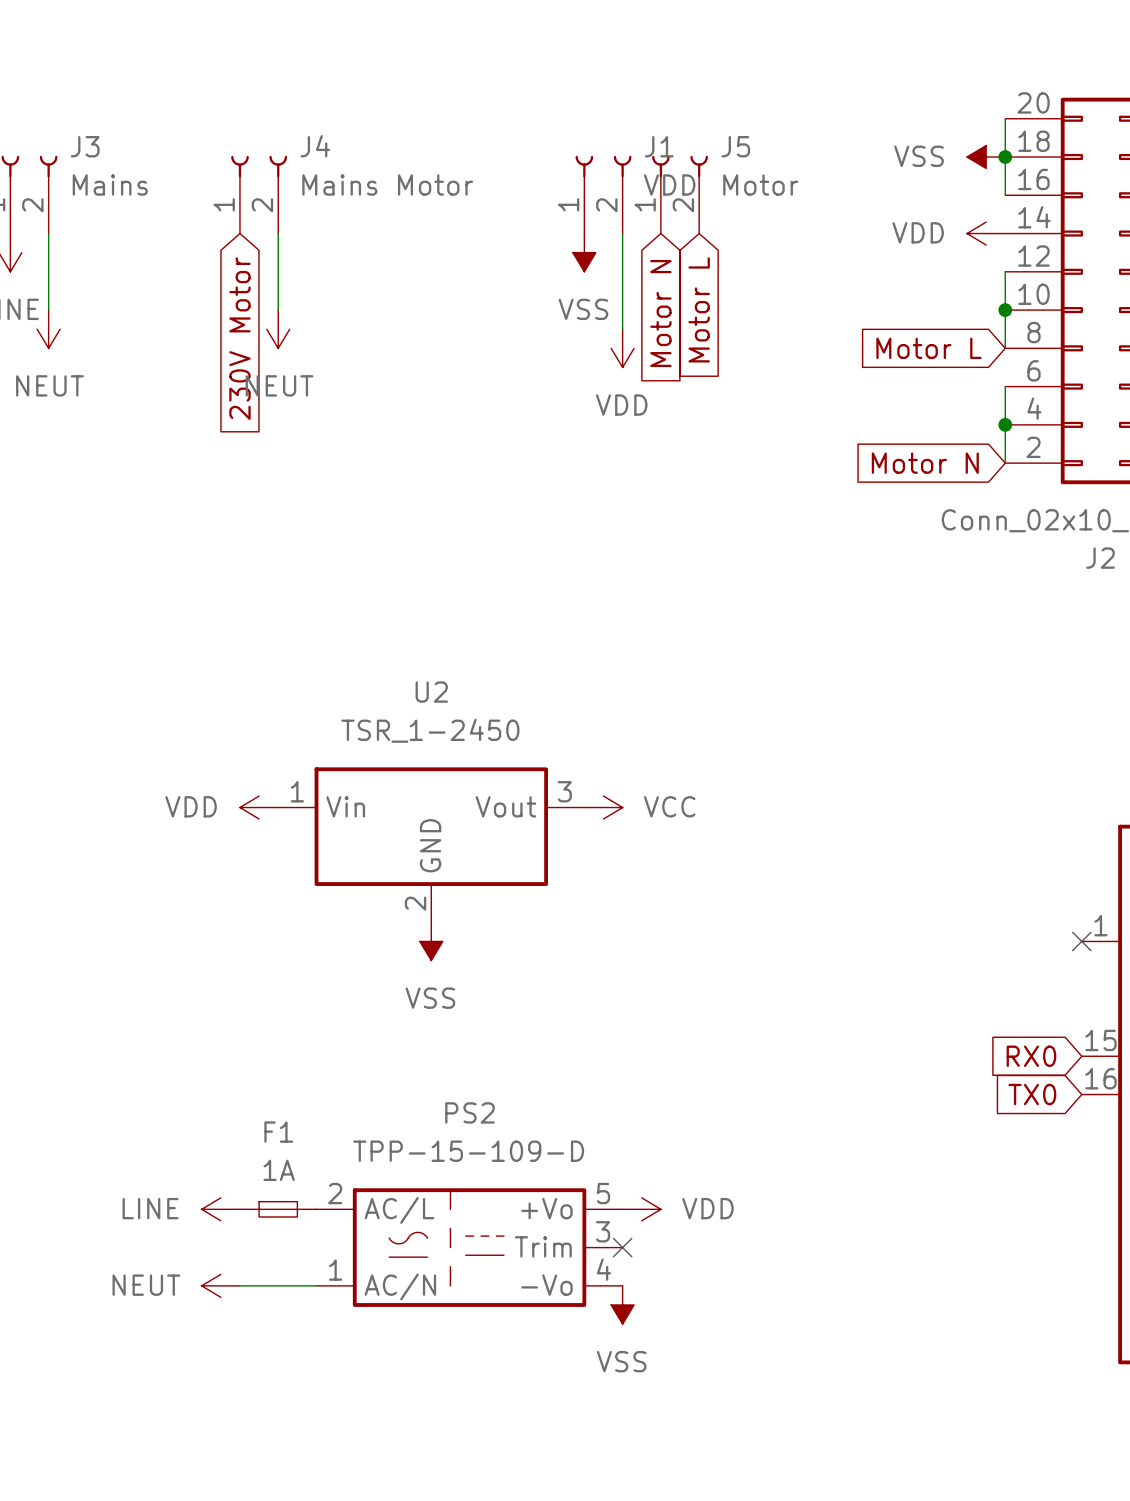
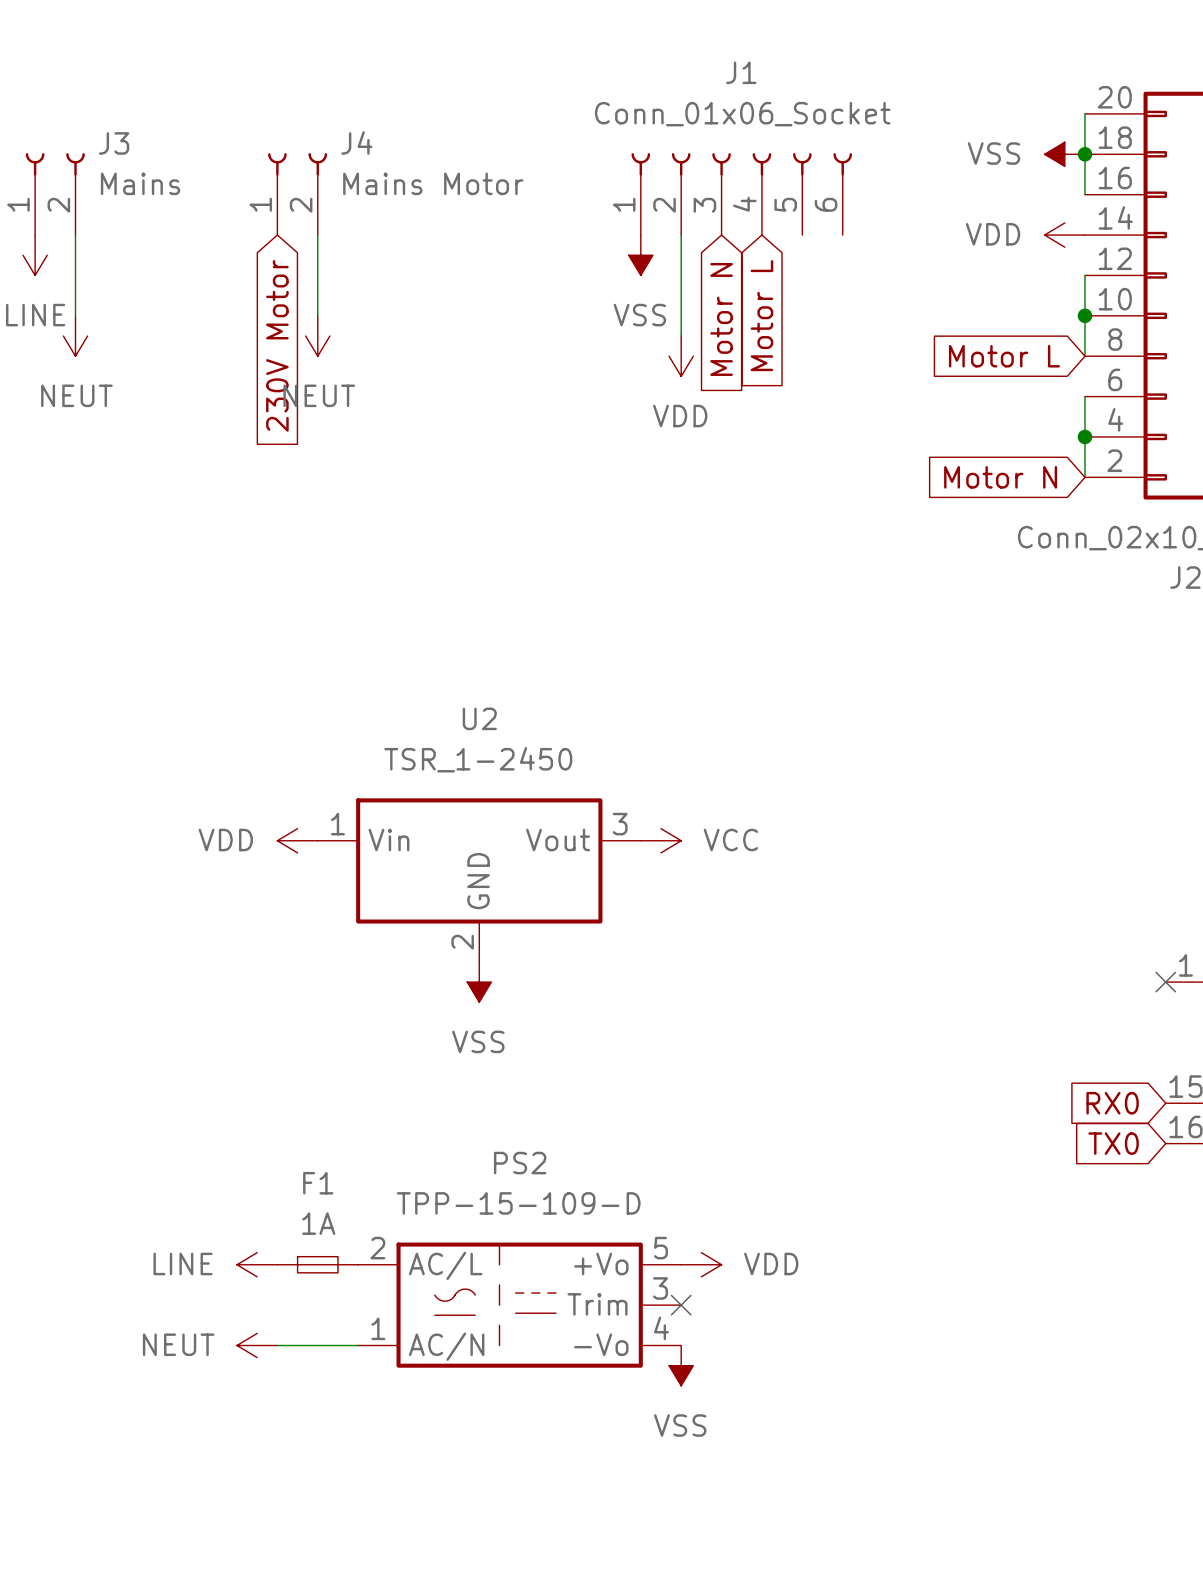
J1 name position: J1 (659, 146) -> J1 (741, 72)
J1 symbol: [575, 155, 632, 234] -> [631, 153, 853, 236]
J1 value: VDD (669, 184) -> Conn_01x06_Socket (742, 114)
J5: Motor (680, 194) -> none

